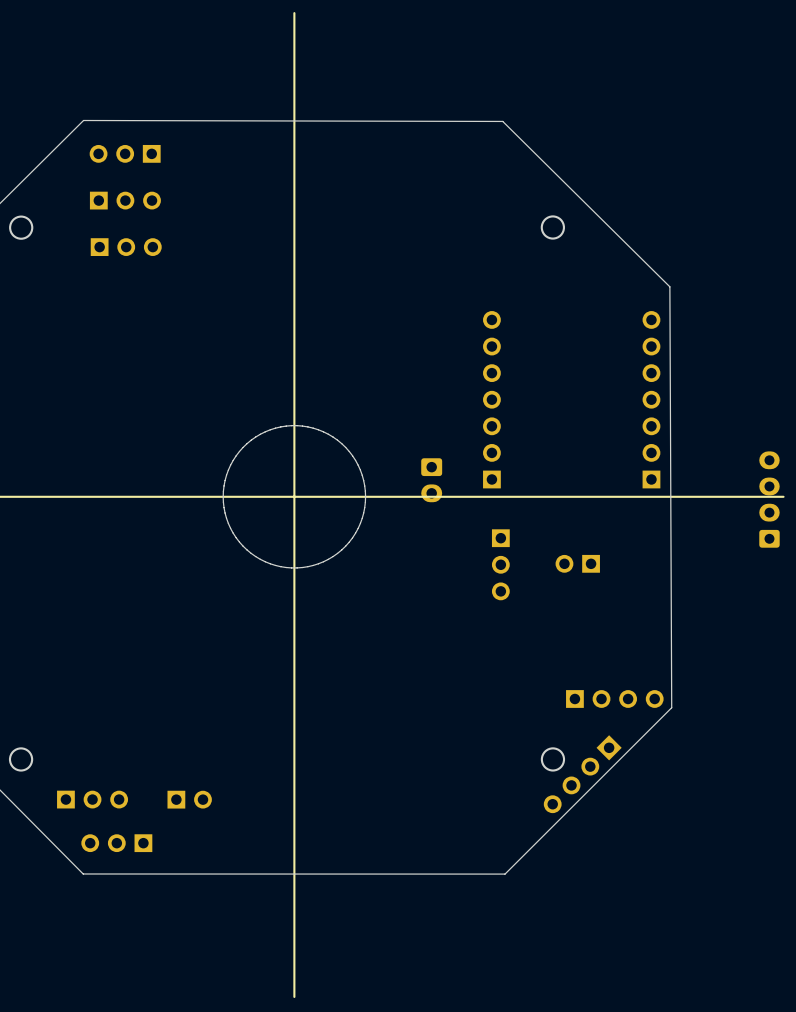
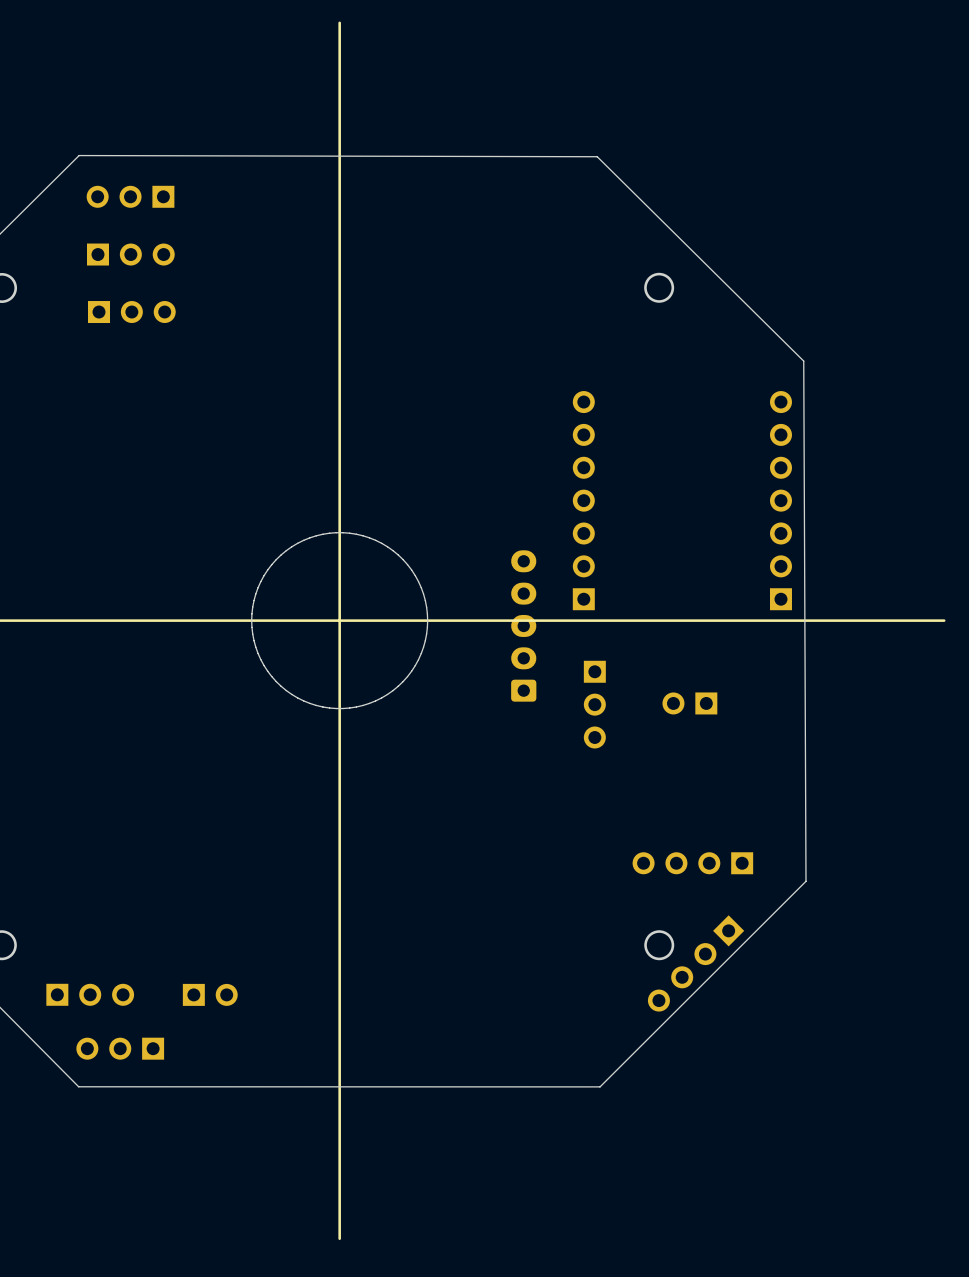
part: (431, 480) -> none
part: (769, 499) -> none
part: none -> (523, 625)
part rotation: 0° (614, 698) -> 180° (692, 863)

